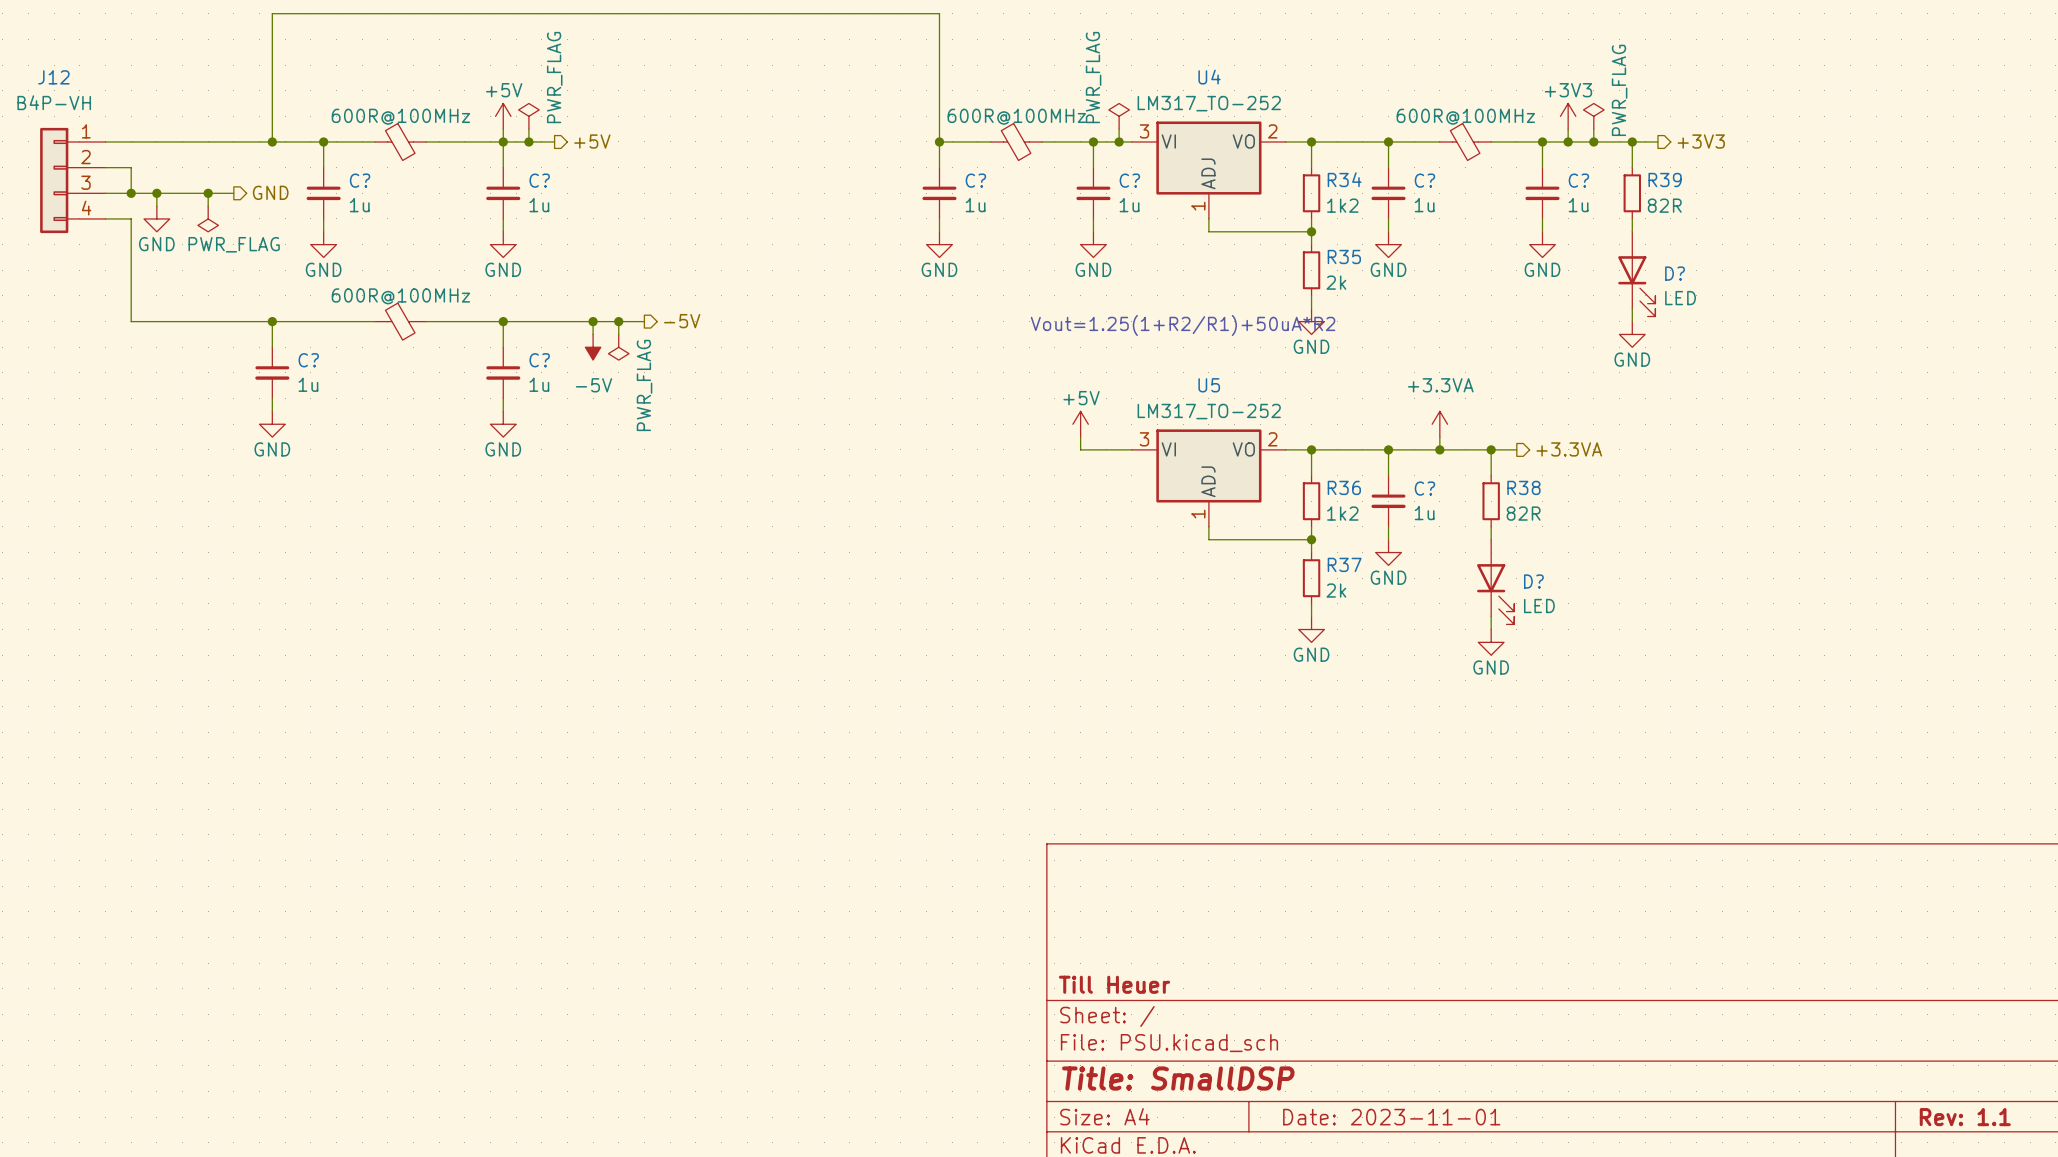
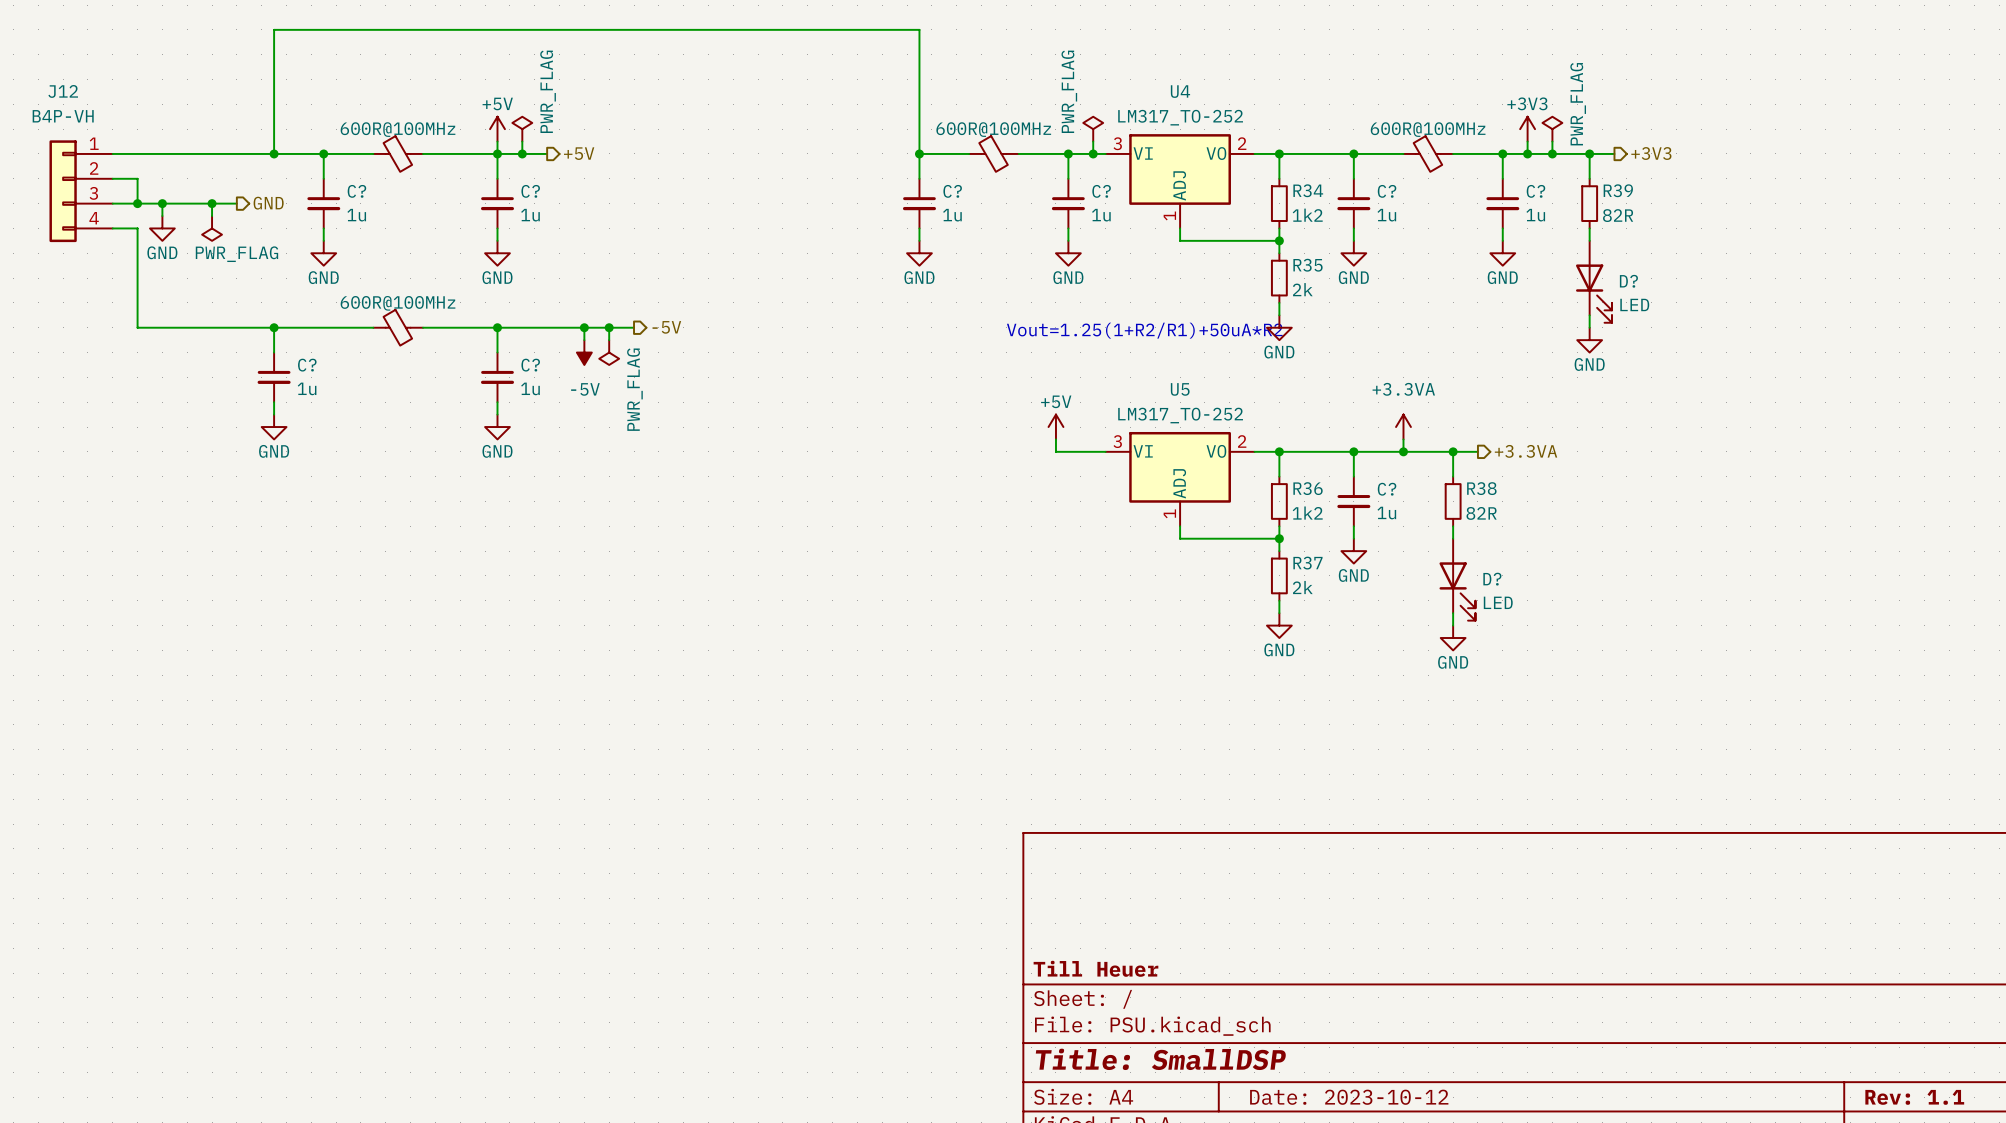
title block: Date: 2023-11-01 (1391, 1117) -> Date: 2023-10-12 (1349, 1097)

